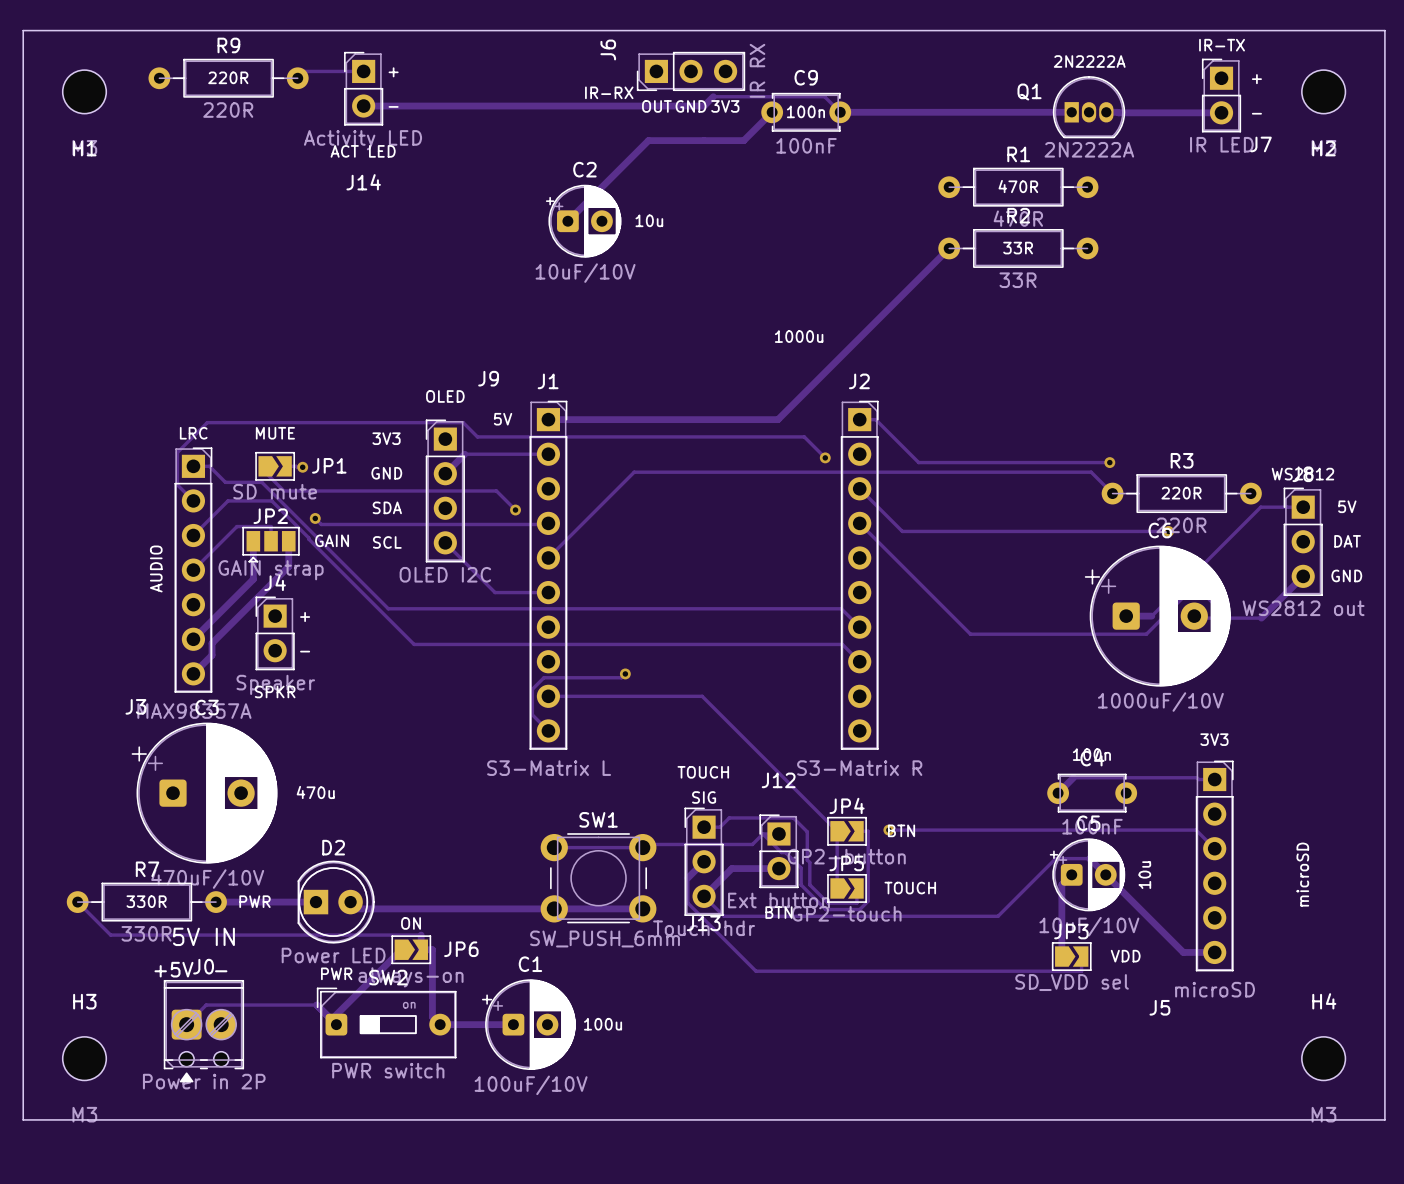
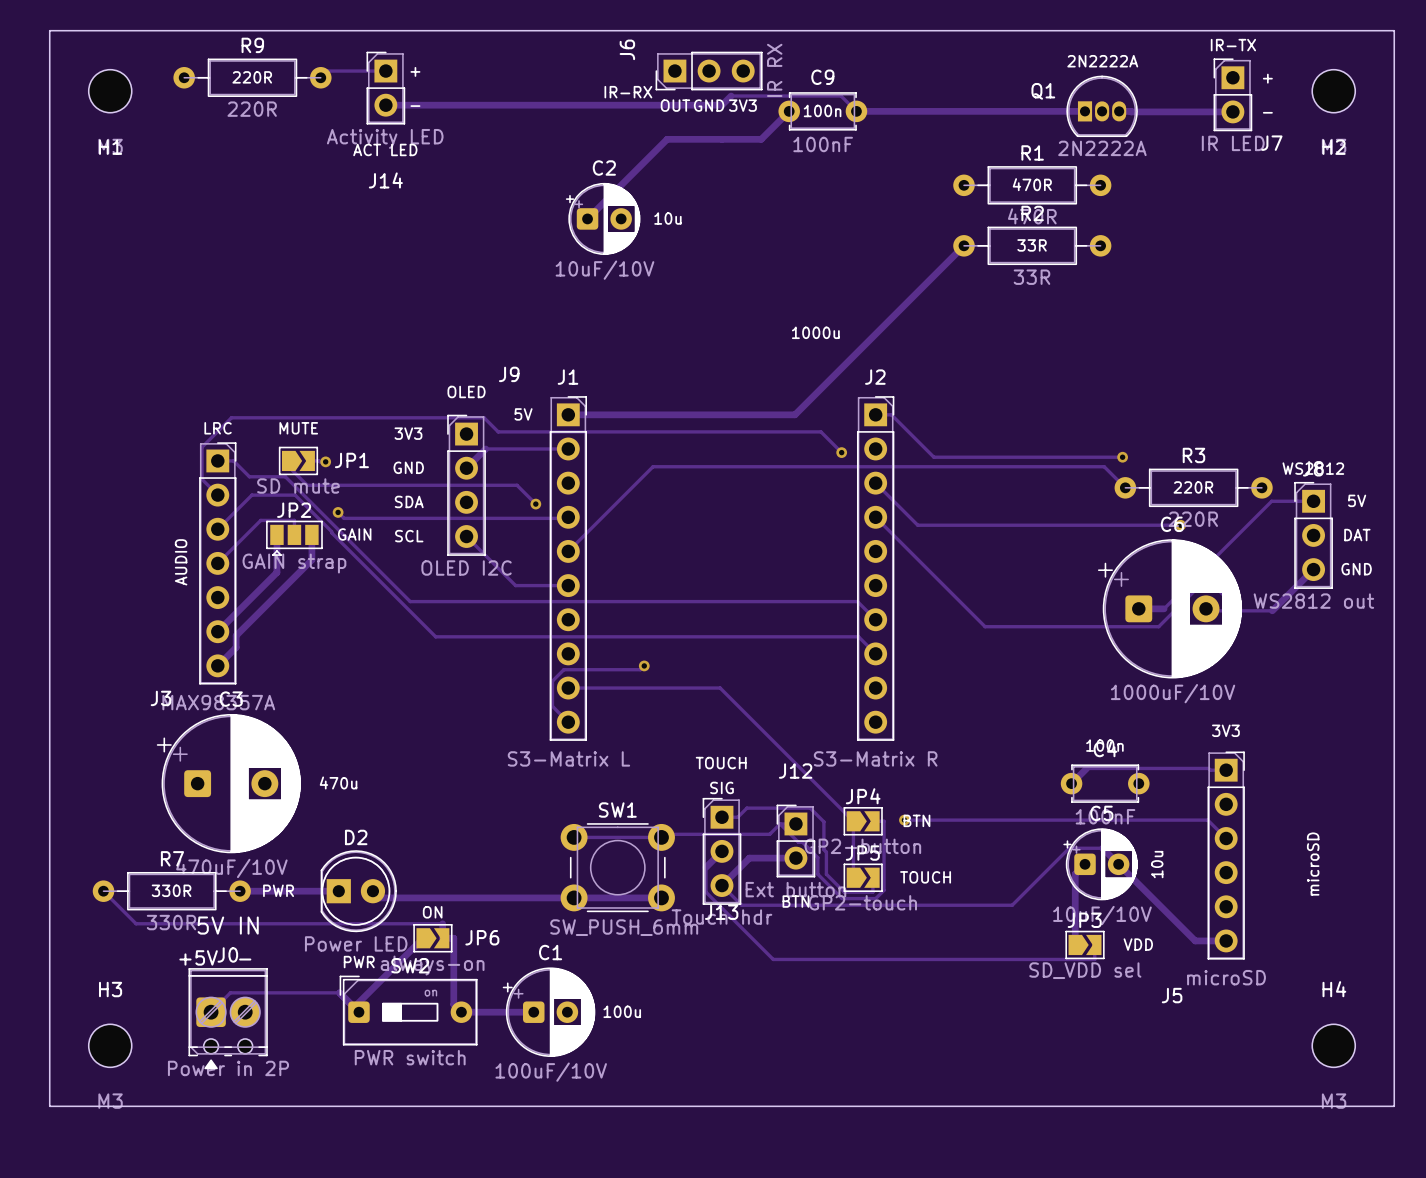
text: + (305, 617) -> none
J4: Speaker (275, 633) -> none
text: - (305, 651) -> none
text: SPKR (275, 691) -> none

